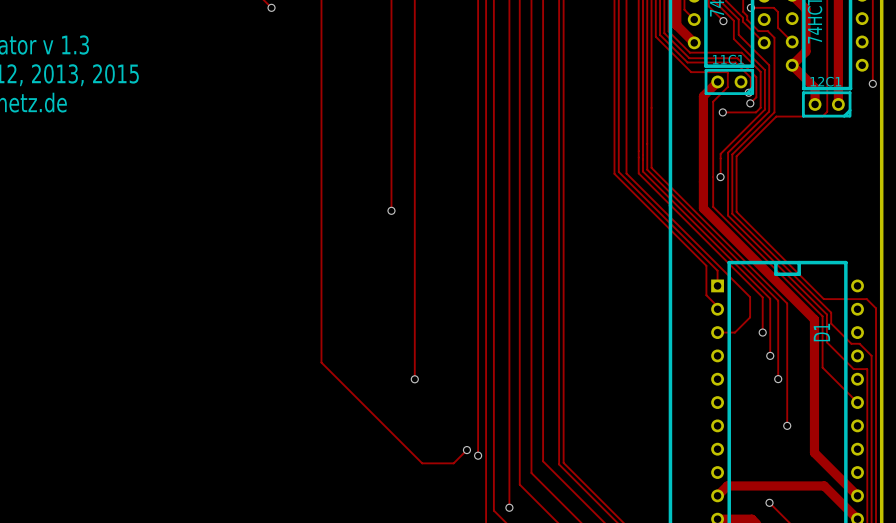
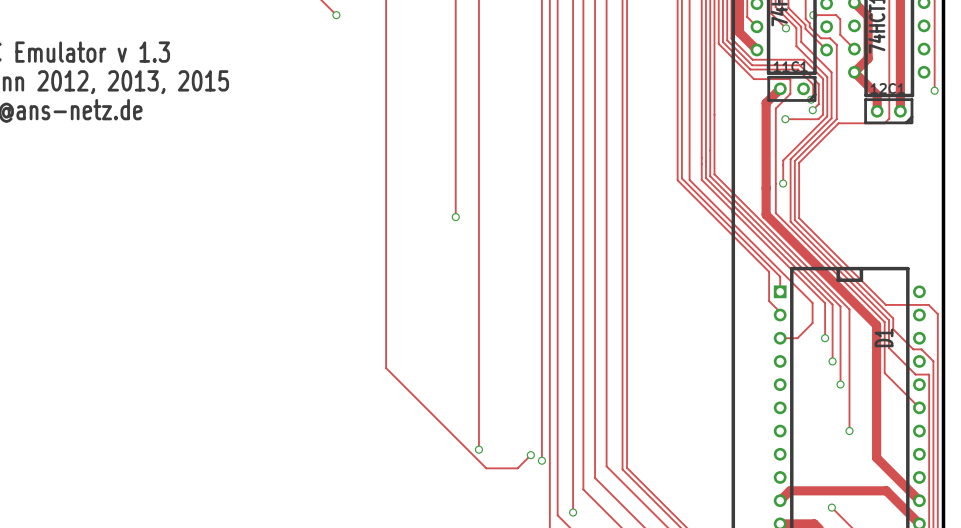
track: none -> (478, 384) (478, 449)
via: (414, 379) -> none
via: none -> (478, 449)

